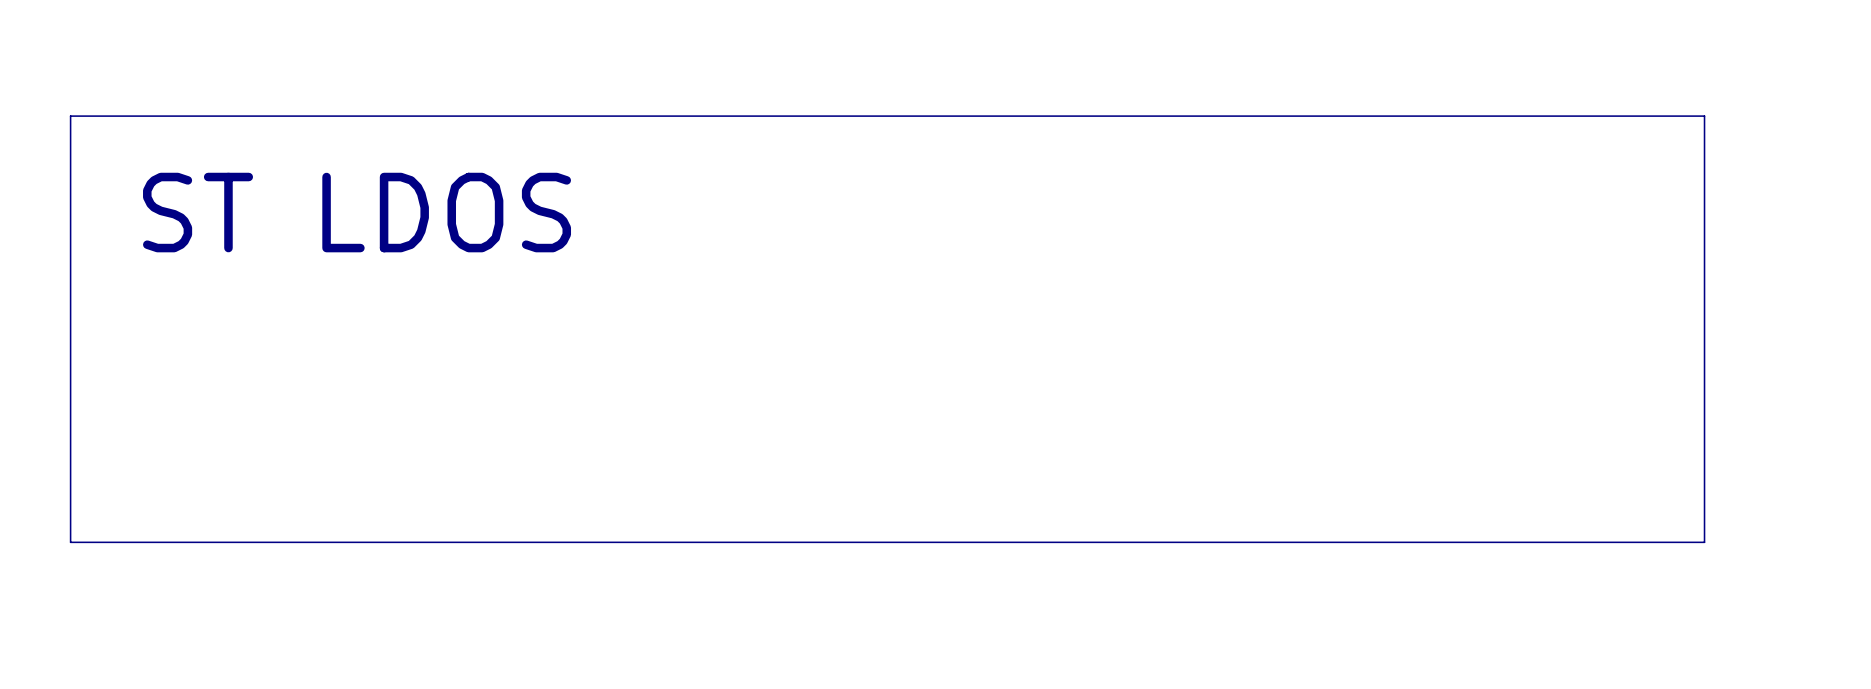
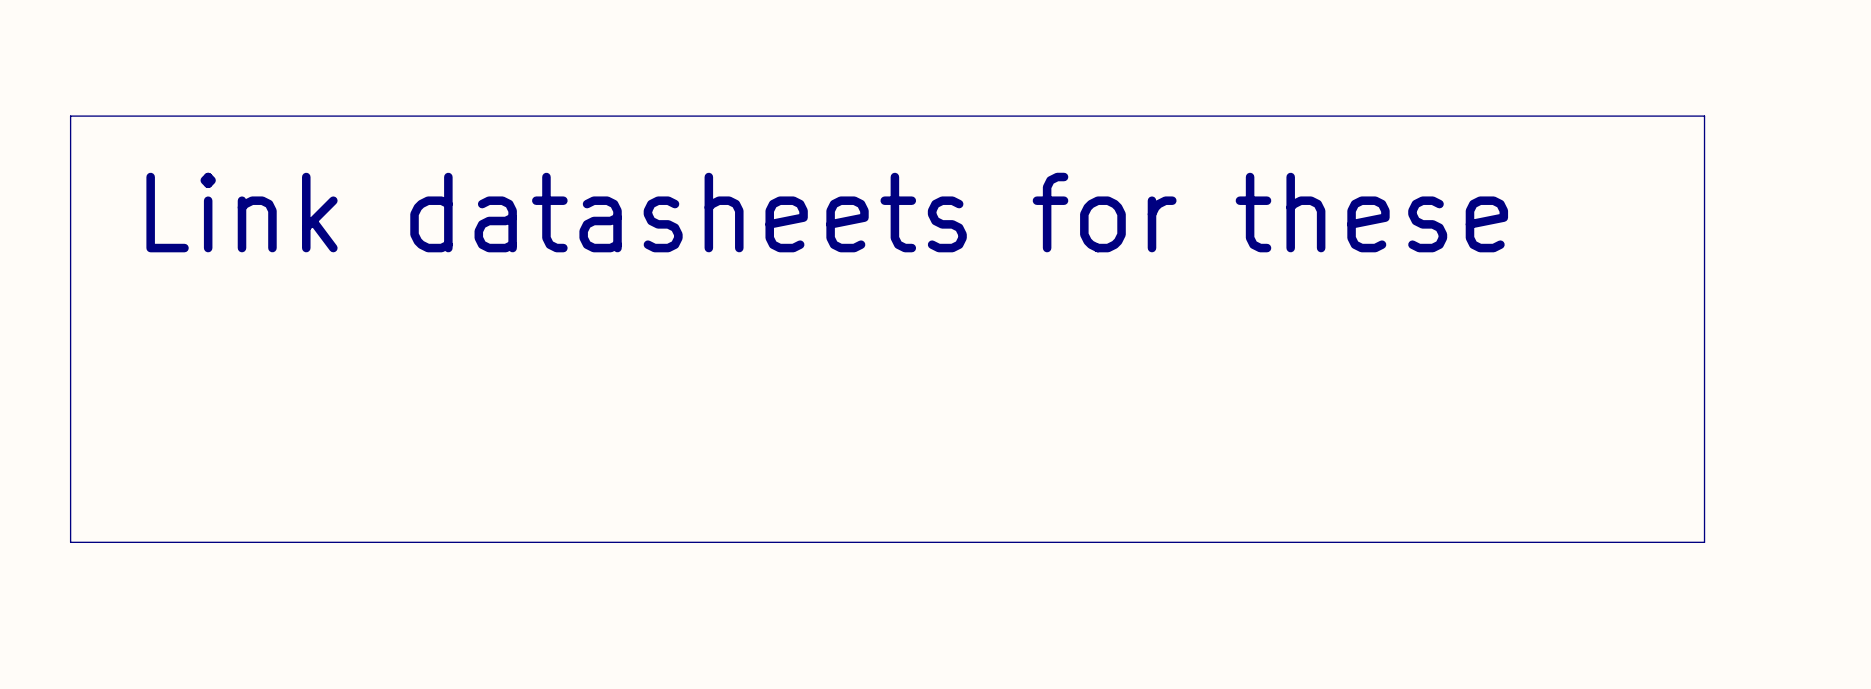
text: ST LDOS (357, 212) -> Link datasheets for these (827, 212)

